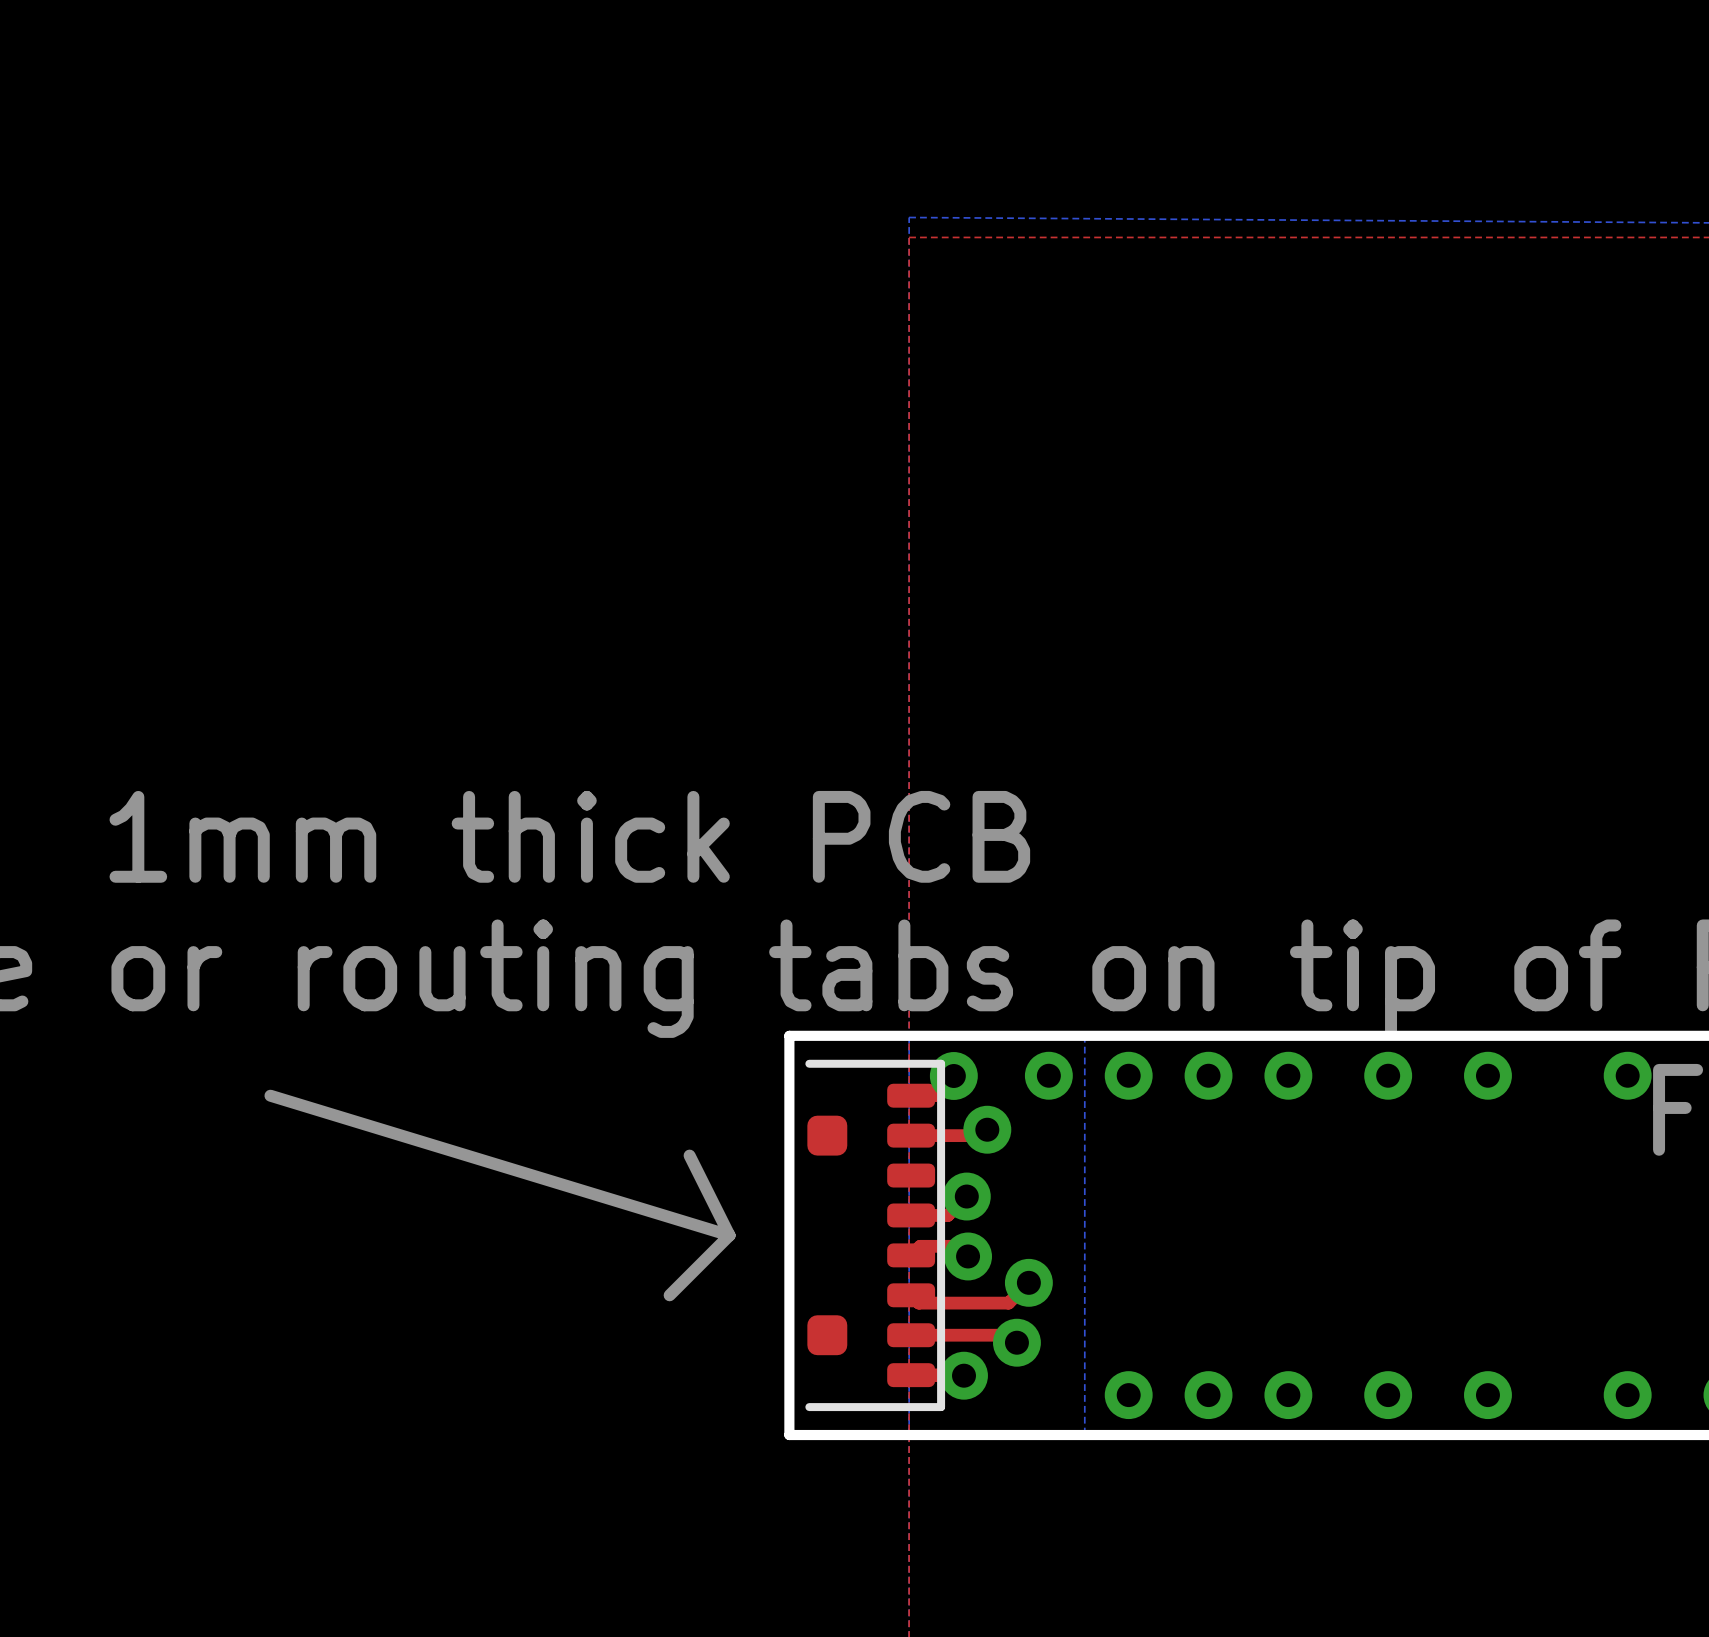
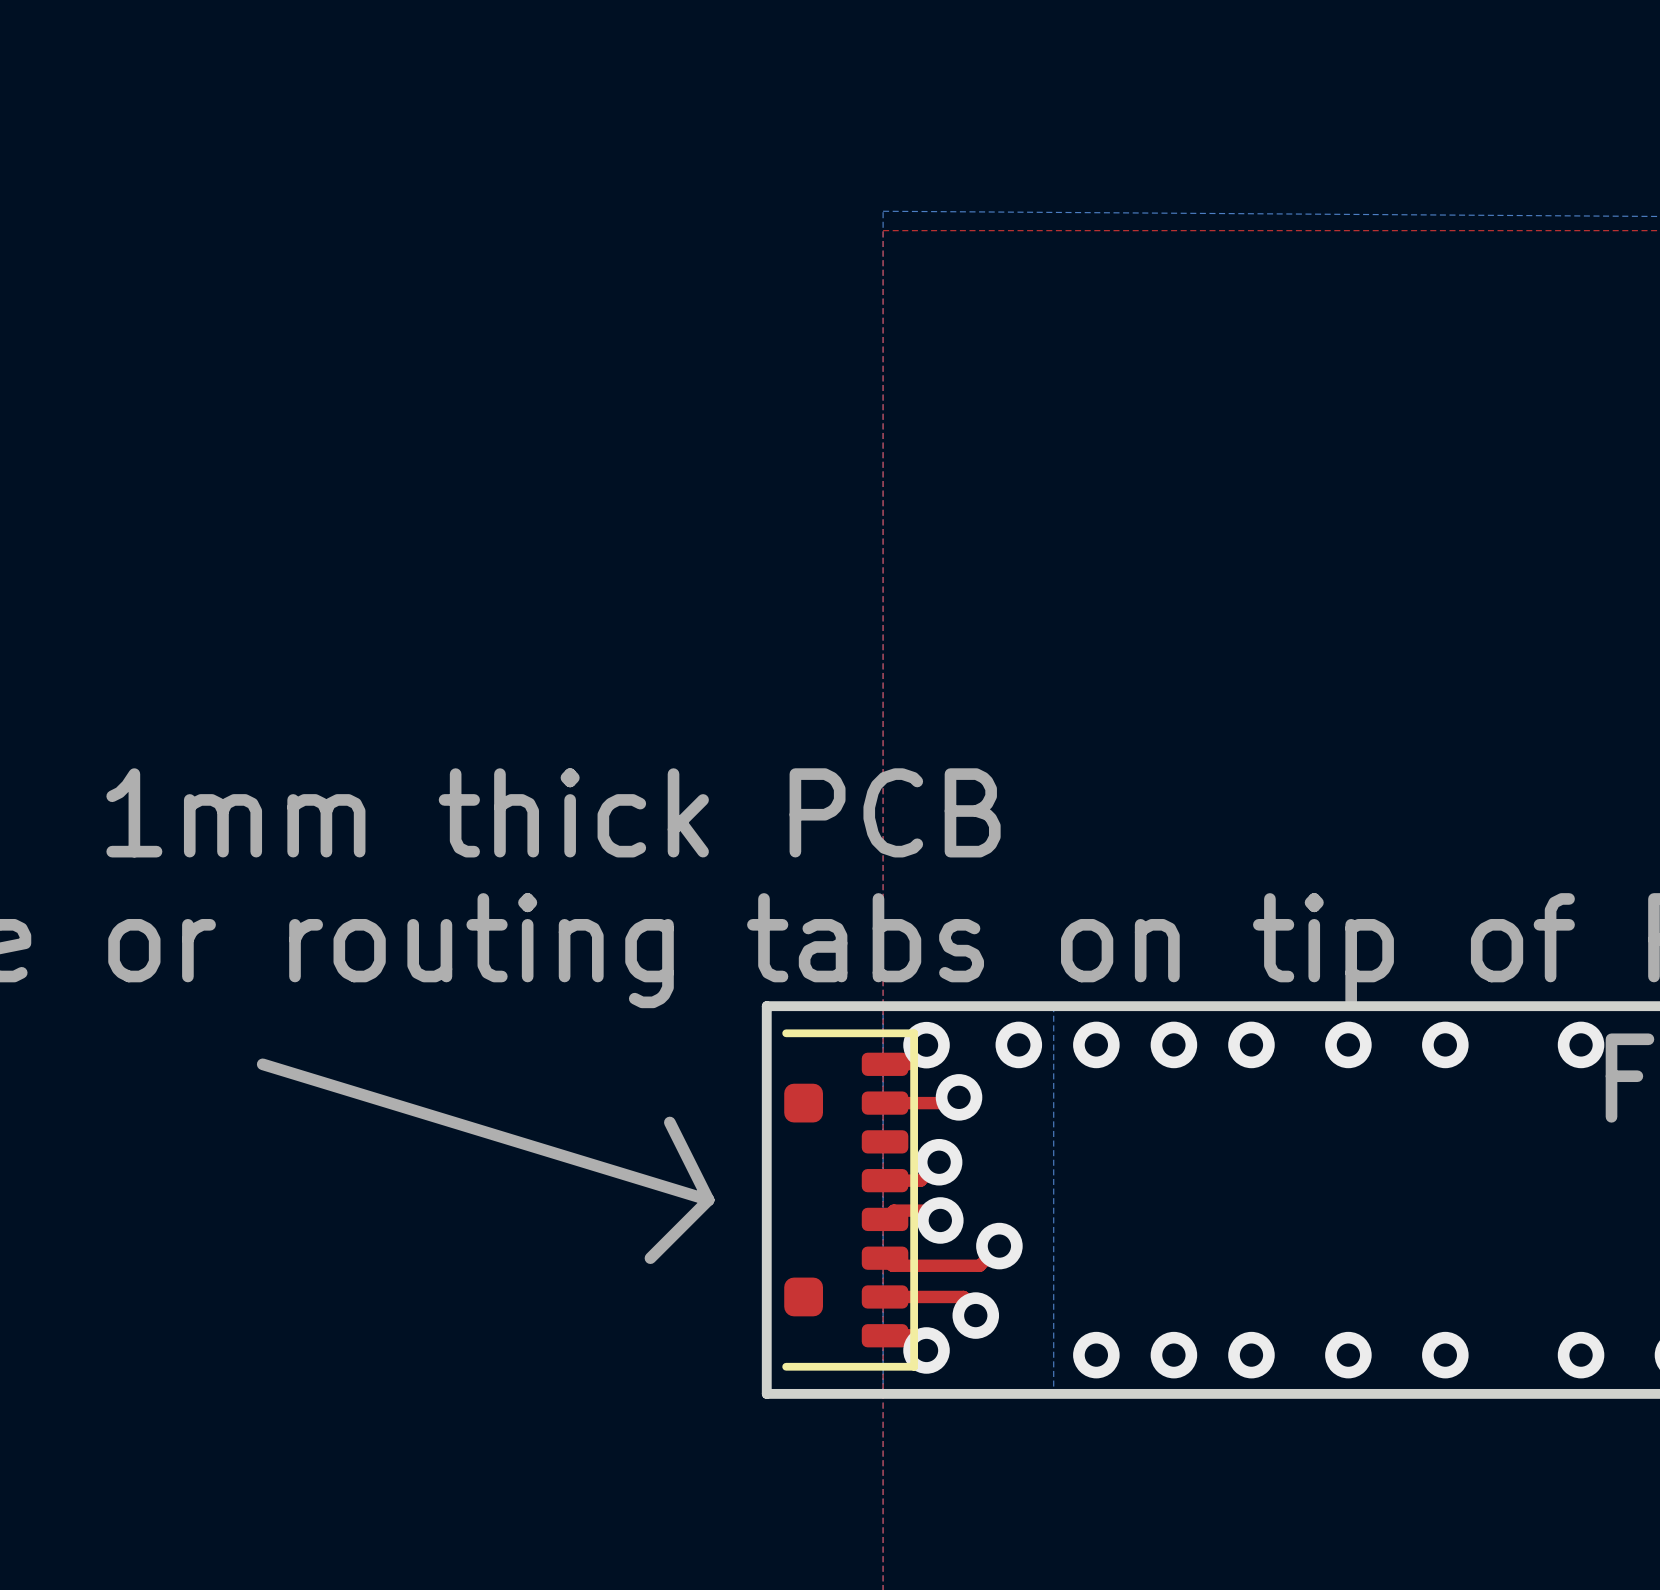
via position: (1016, 1342) -> (975, 1315)
via position: (963, 1375) -> (926, 1350)

